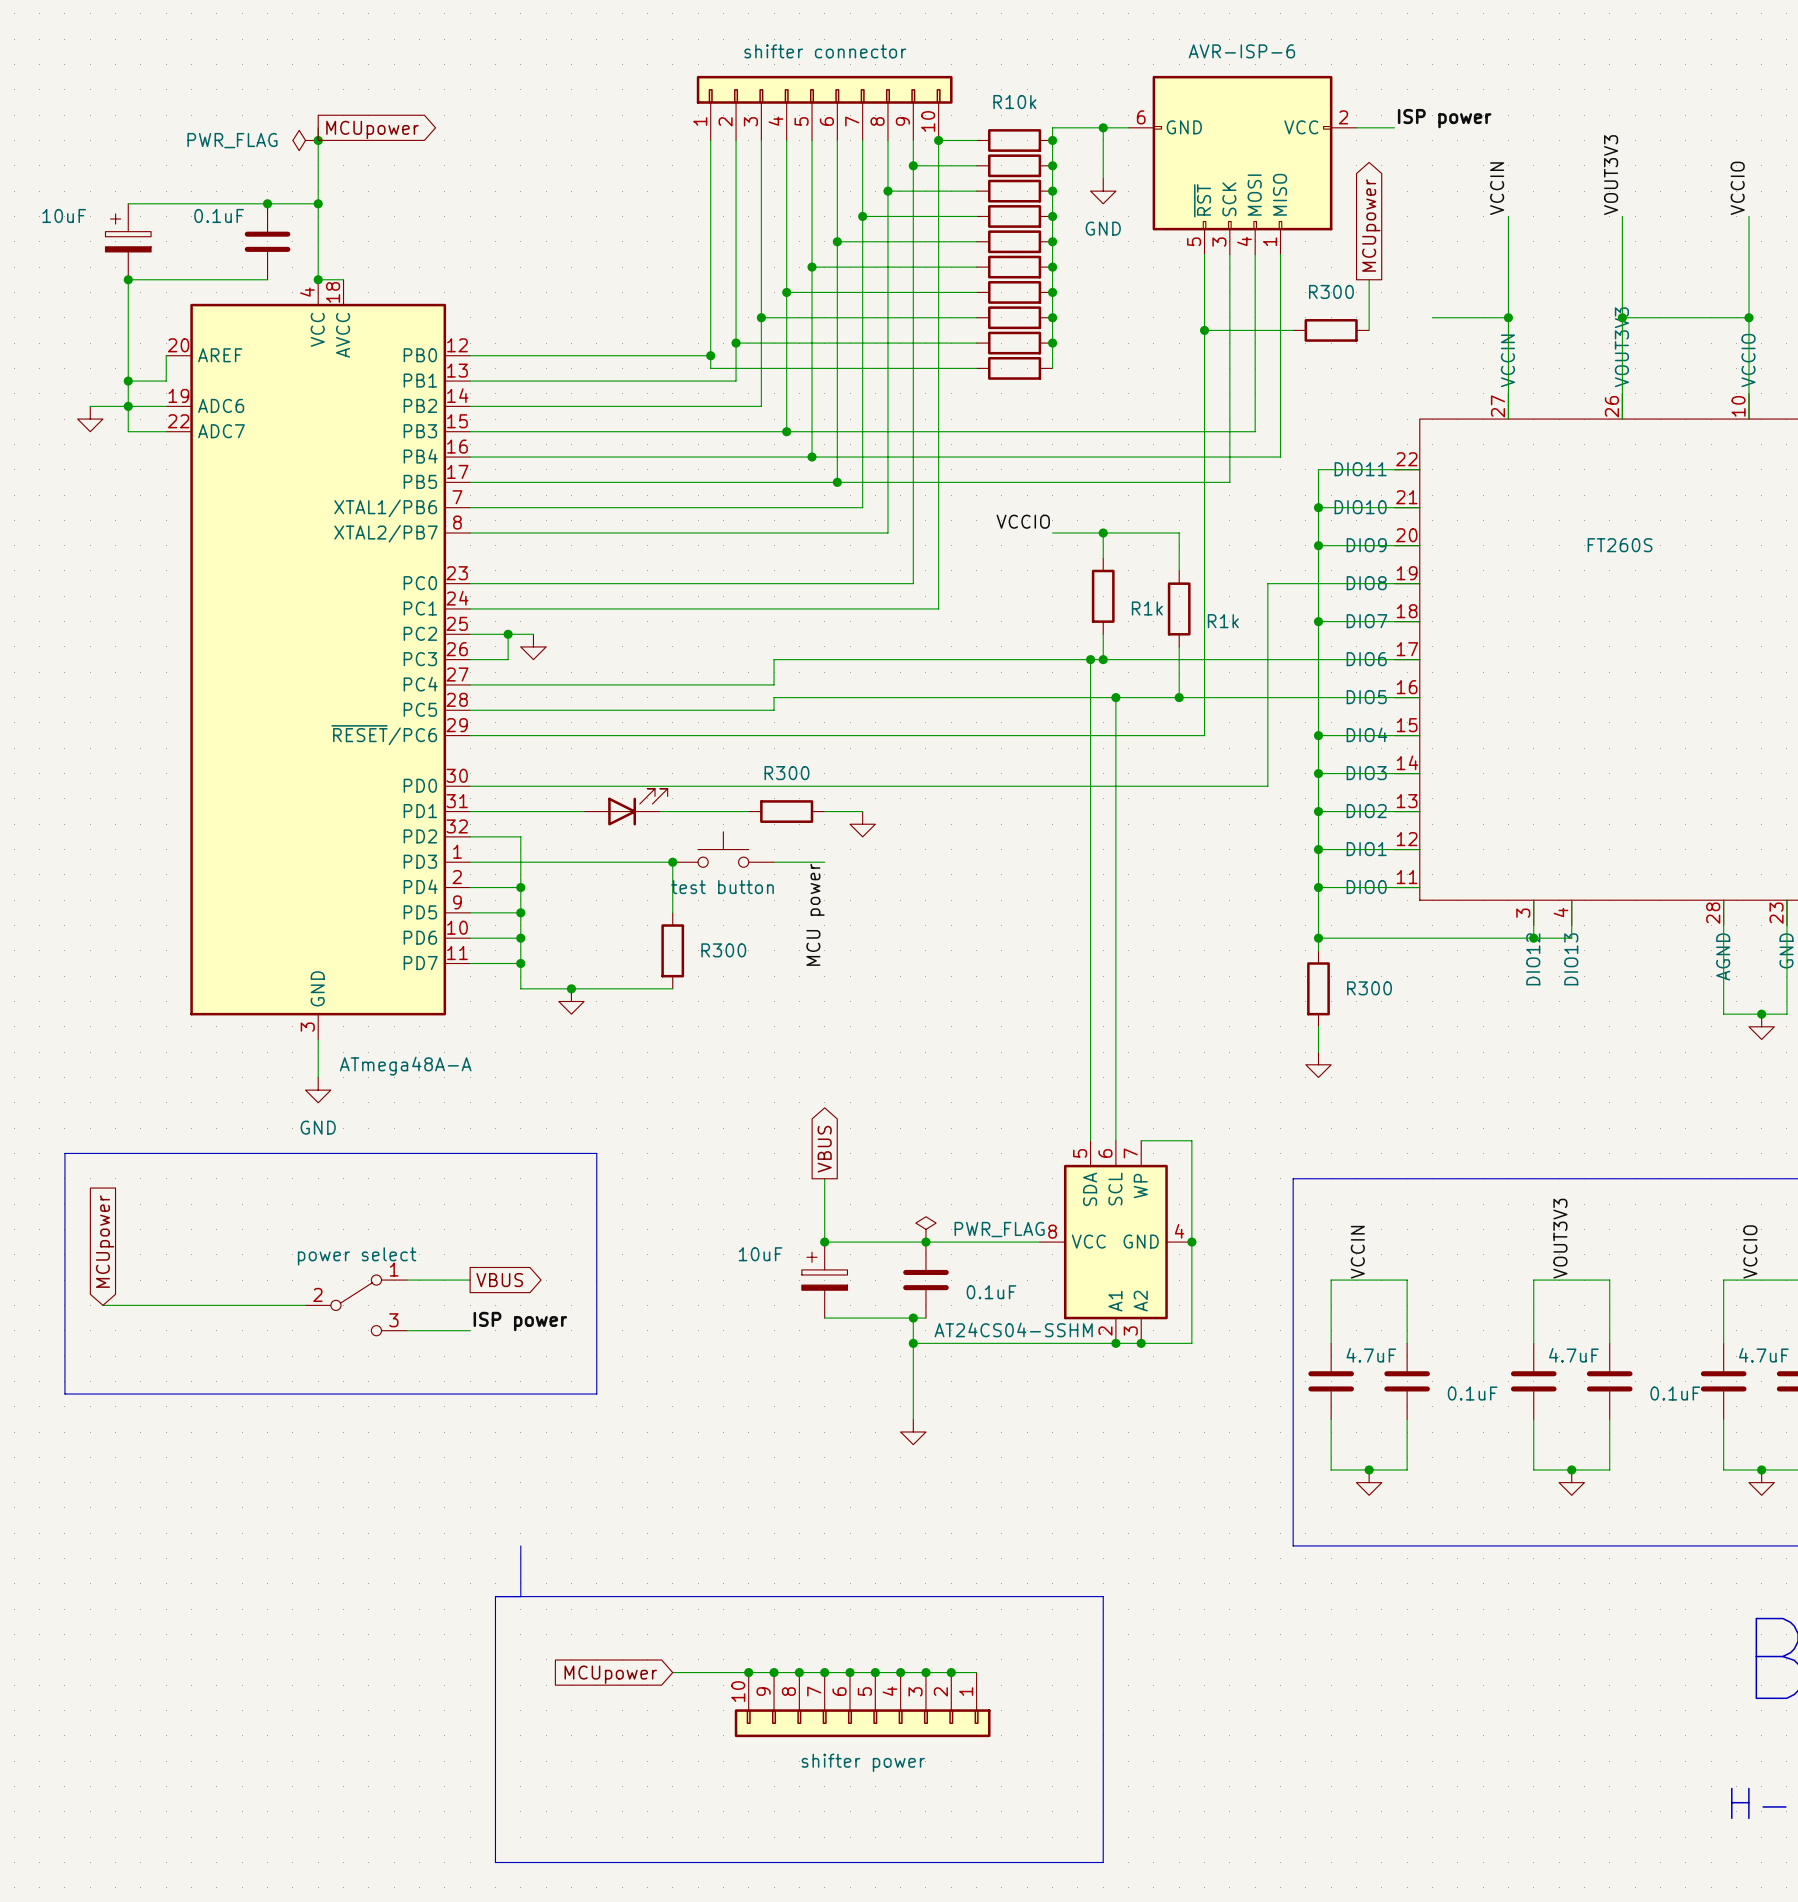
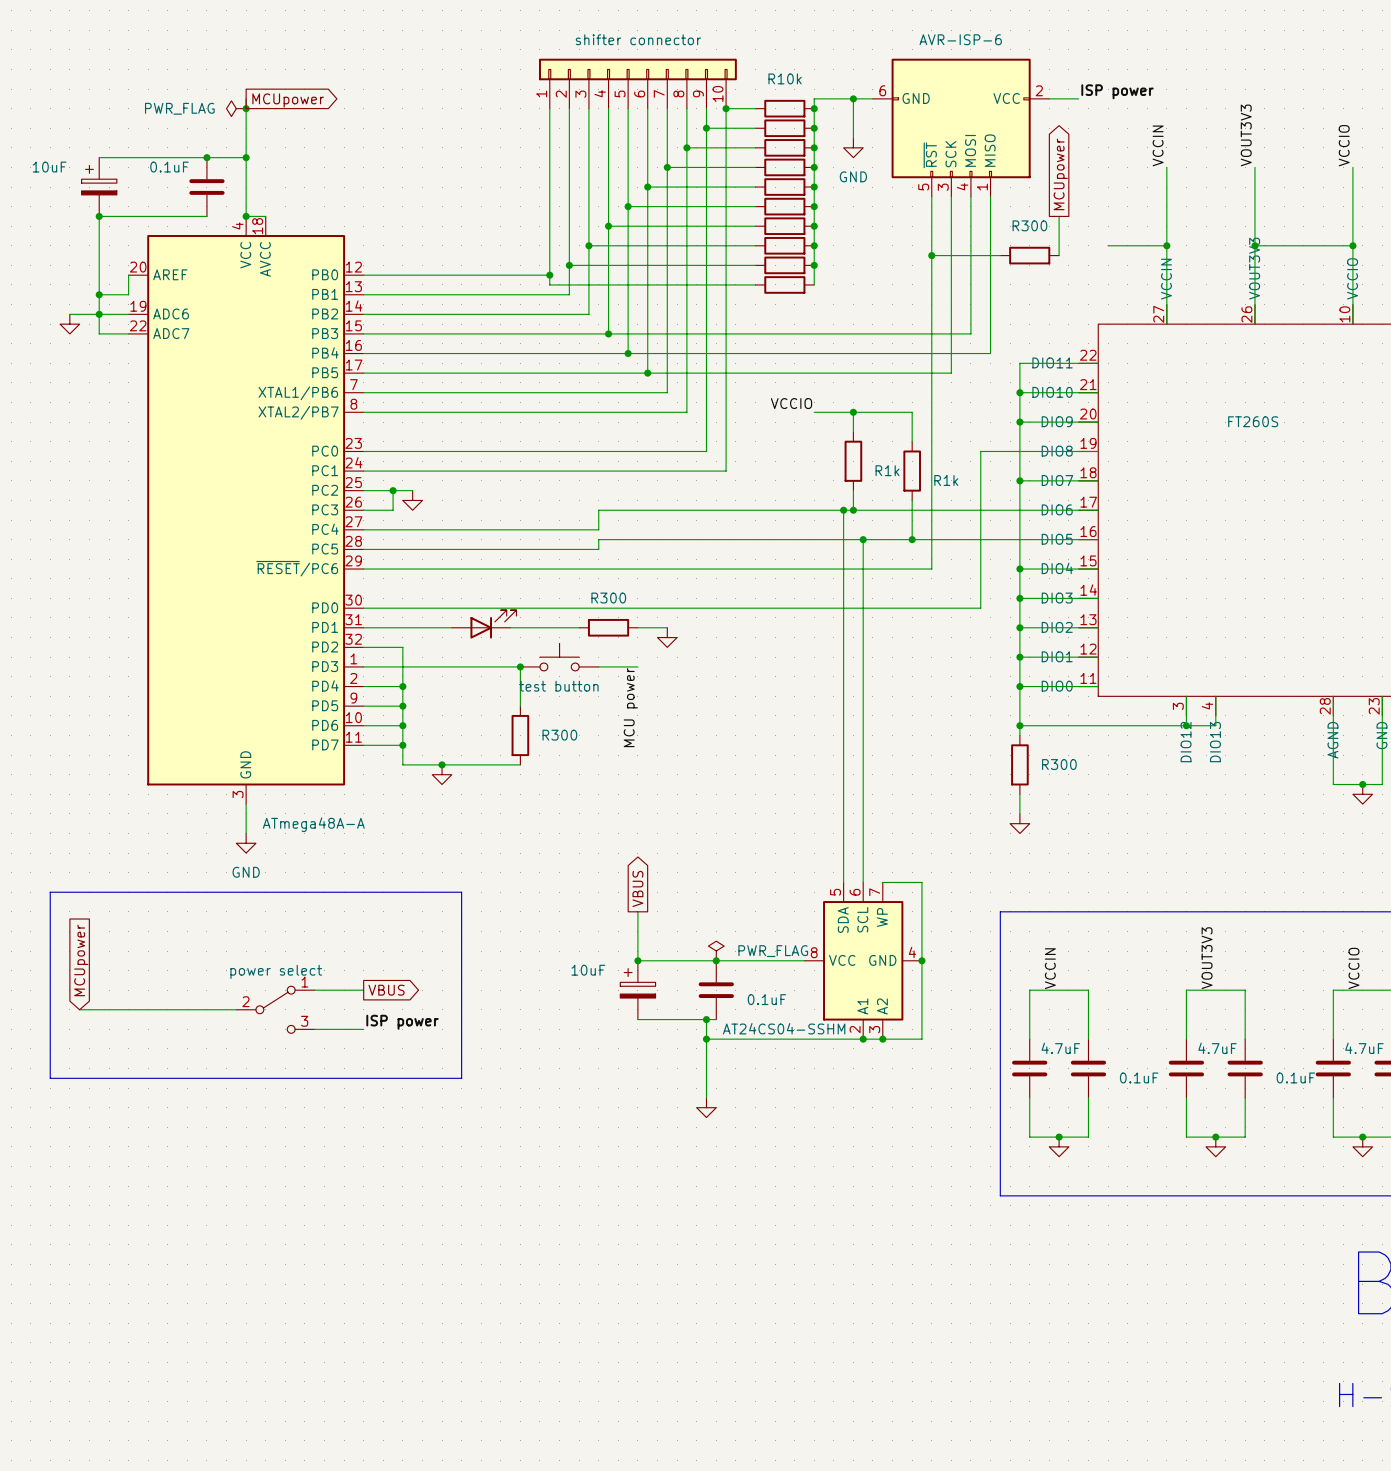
line: (520, 1545) (520, 1596) -> none
line: (495, 1596) (1103, 1596) (1103, 1862) (495, 1862) (495, 1596) -> none
wire: (672, 1672) (976, 1672) -> none
junction: (748, 1672) -> none
junction: (774, 1672) -> none
junction: (799, 1672) -> none
junction: (824, 1672) -> none
junction: (850, 1672) -> none
junction: (875, 1672) -> none
junction: (900, 1672) -> none
junction: (925, 1672) -> none
junction: (951, 1672) -> none
global label: MCUpower (610, 1674) -> none
part: shifter power (862, 1704) -> none

